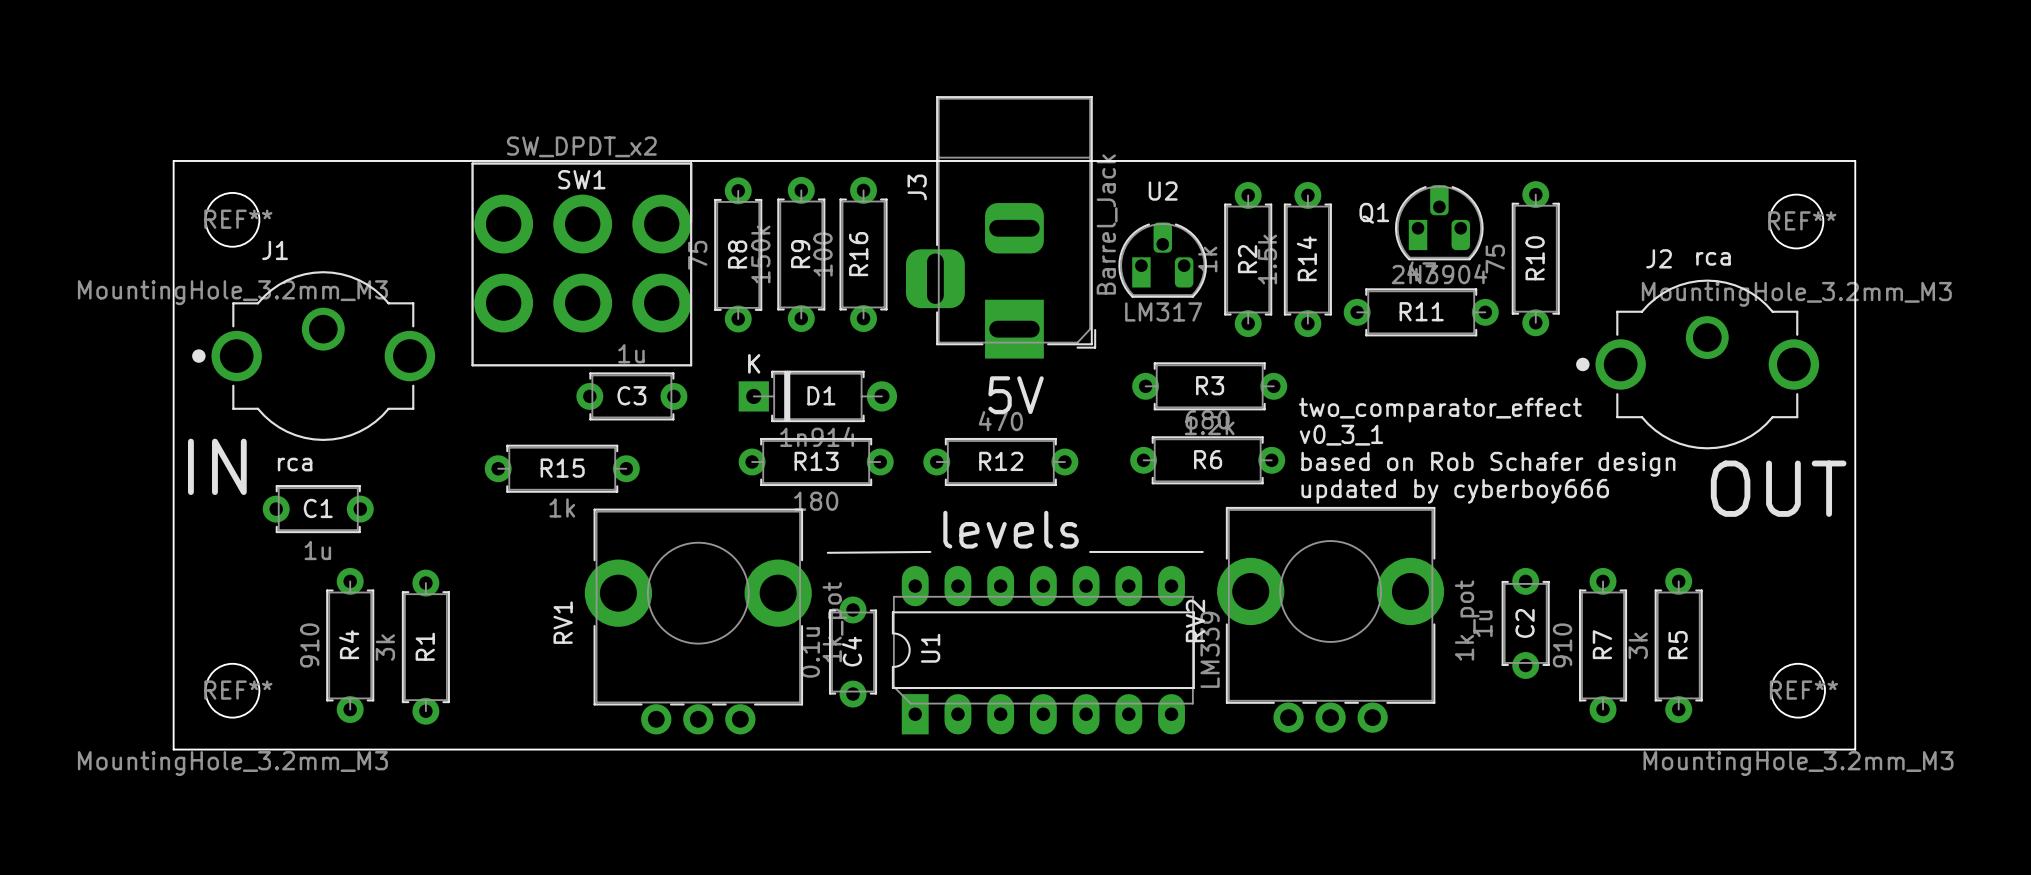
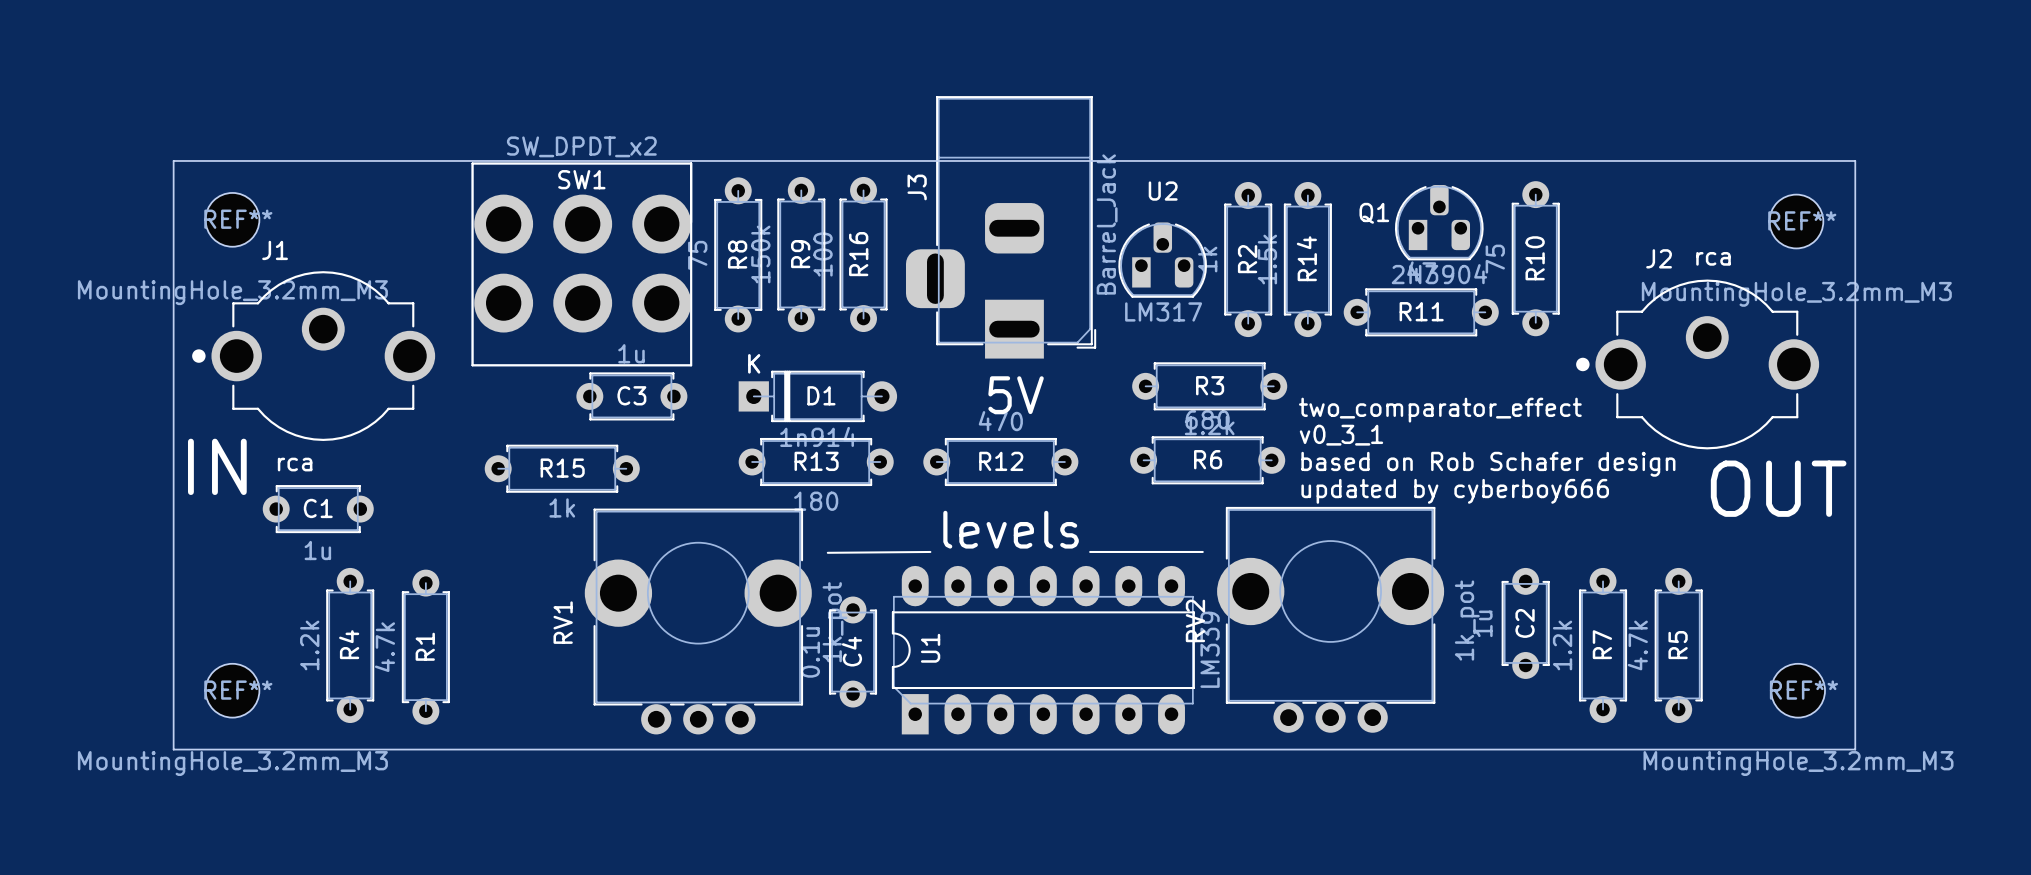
R4 value: 910 (309, 645) -> 1.2k (309, 645)
R7 value: 910 (1562, 645) -> 1.2k (1562, 645)
R5 value: 3k (1638, 645) -> 4.7k (1637, 645)
R1 value: 3k (385, 647) -> 4.7k (384, 647)

